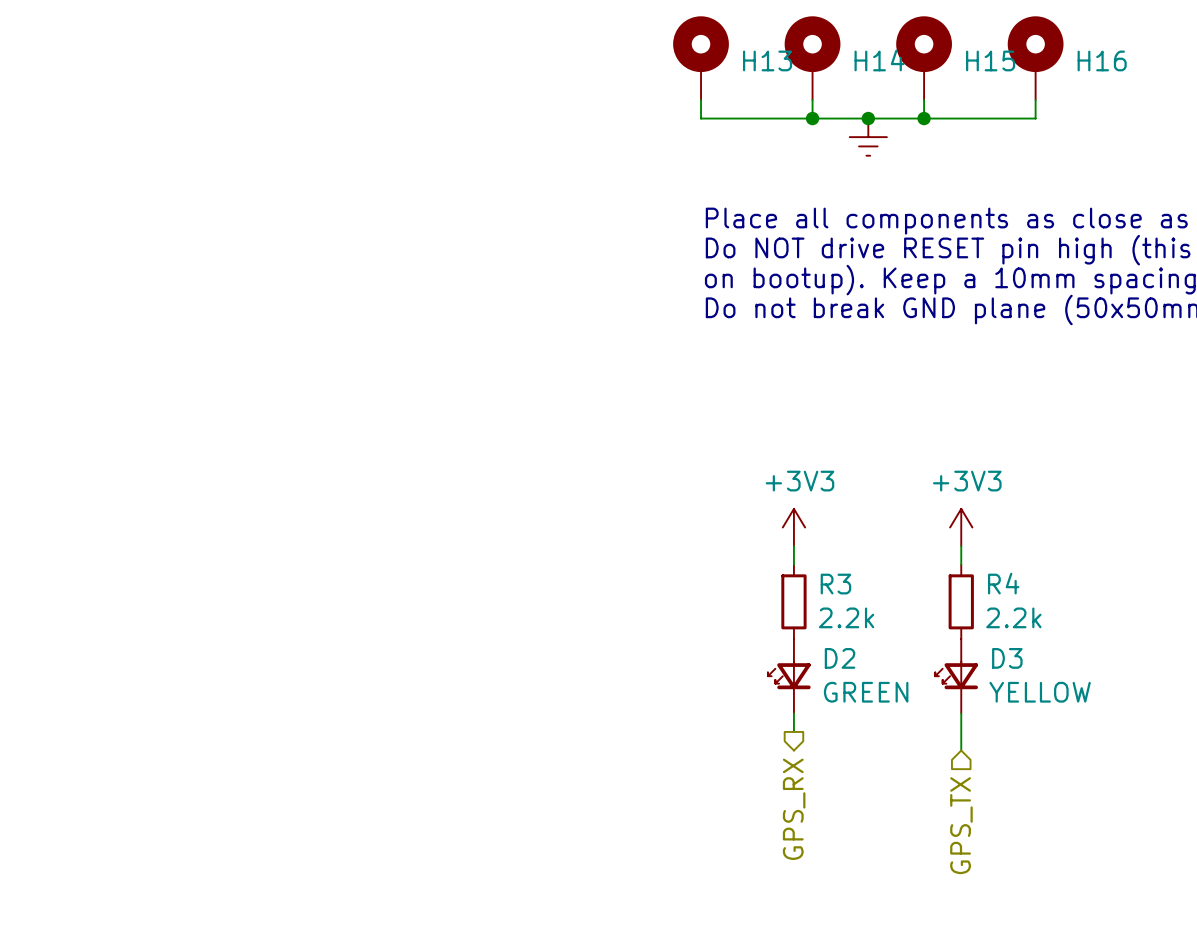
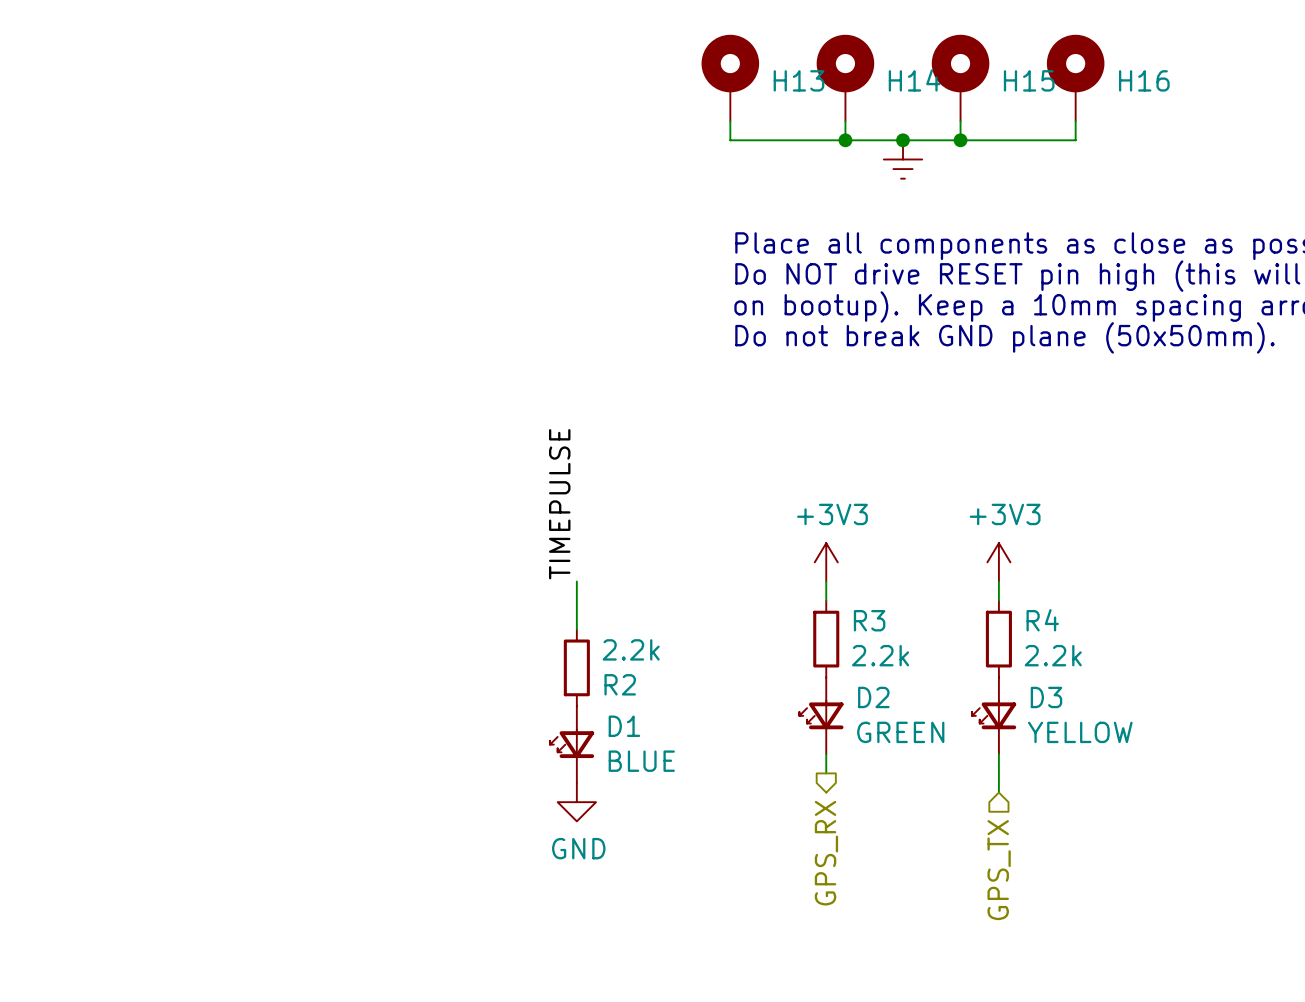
label: none -> TIMEPULSE (559, 504)
wire: none -> (576, 581) (576, 629)
R2: none -> 2.2k (576, 667)
D1: none -> BLUE (572, 744)
power symbol: none -> GND (576, 802)

